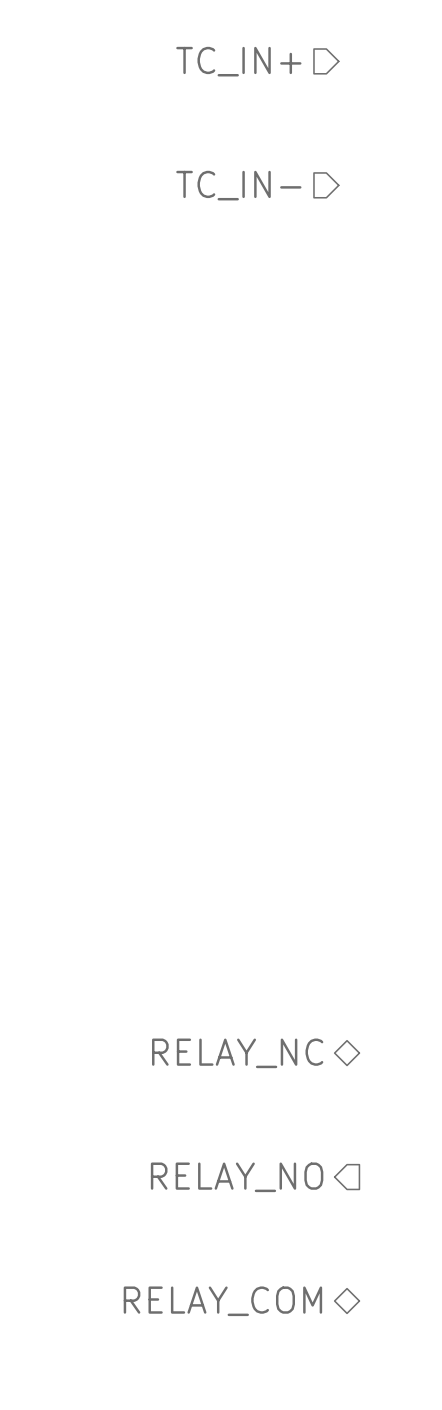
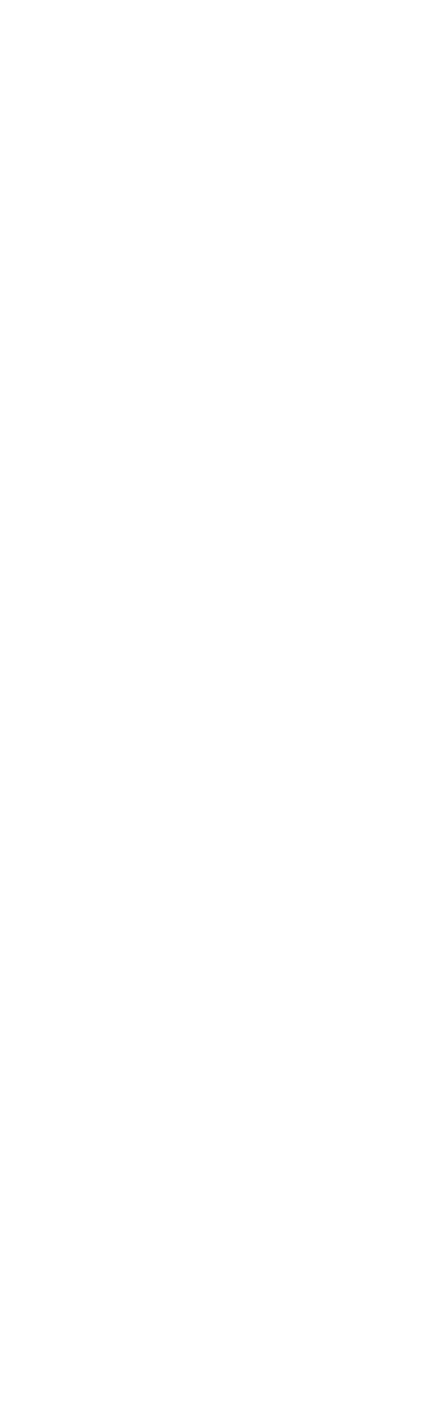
hierarchical label: TC_IN+ (238, 61) -> none
hierarchical label: TC_IN- (238, 185) -> none
hierarchical label: RELAY_NC (237, 1053) -> none
hierarchical label: RELAY_NO (237, 1177) -> none
hierarchical label: RELAY_COM (222, 1301) -> none

